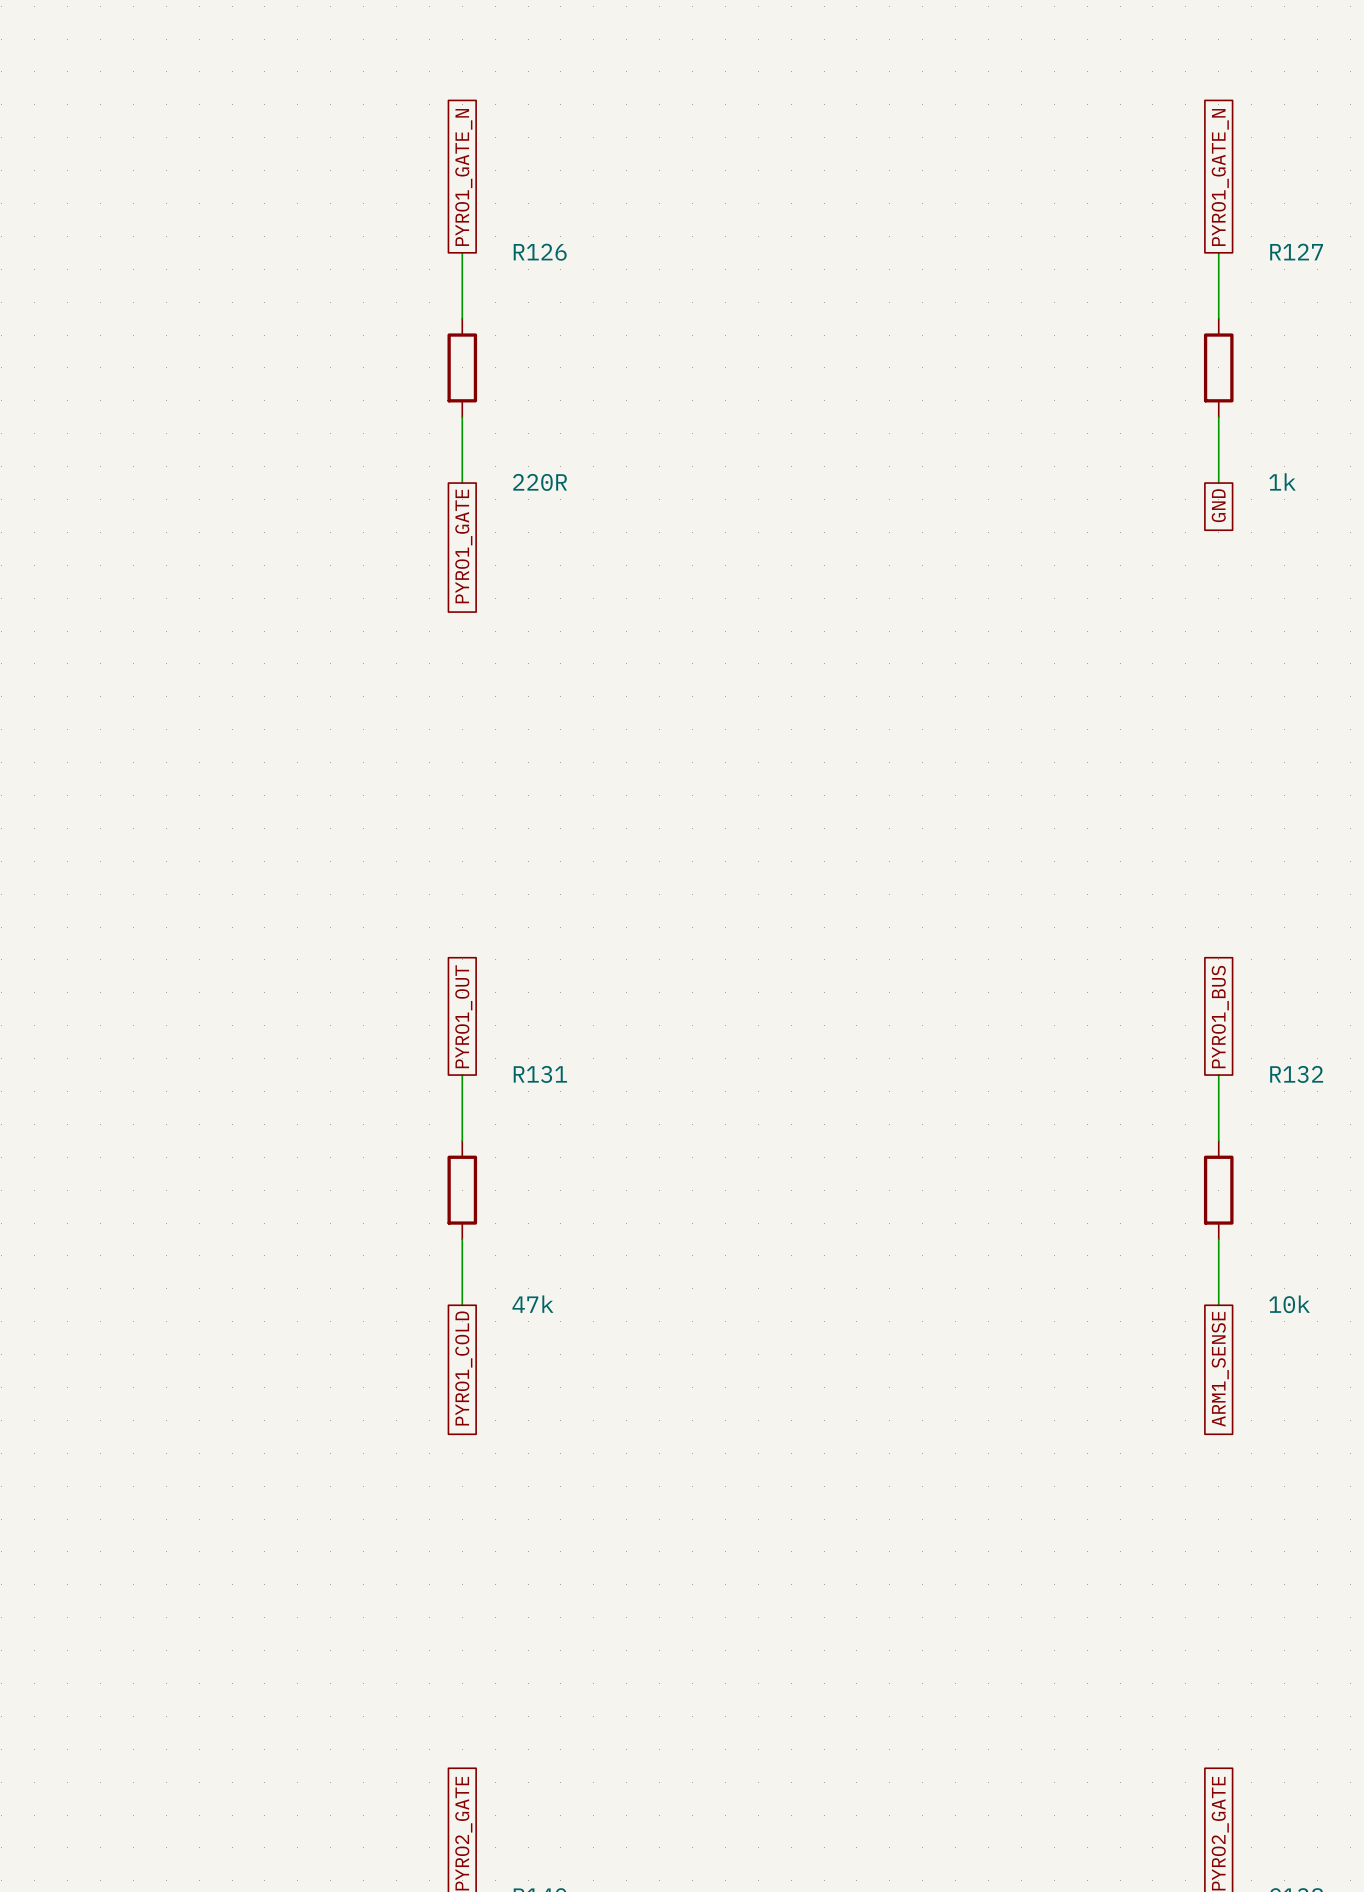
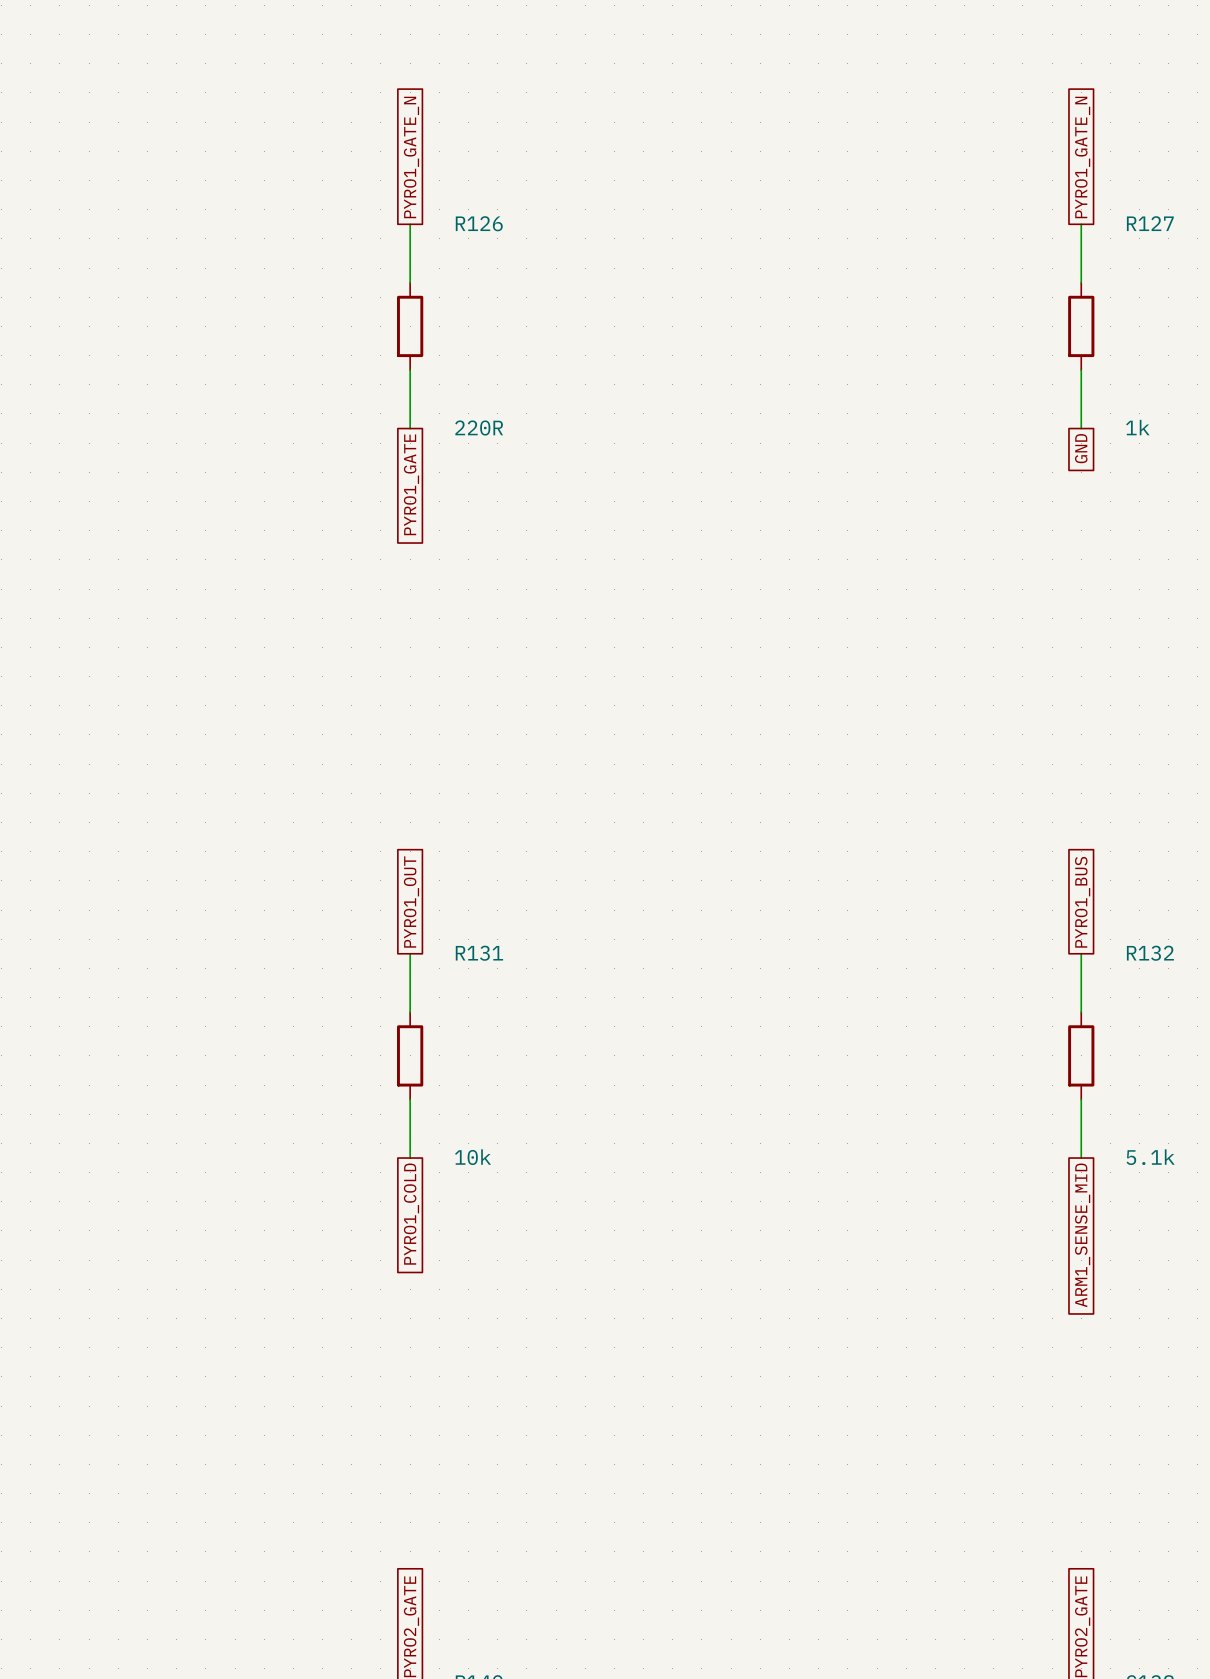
R131 value: 47k (532, 1304) -> 10k (473, 1157)
R132 value: 10k (1289, 1304) -> 5.1k (1150, 1157)
global label: ARM1_SENSE (1220, 1369) -> ARM1_SENSE_MID (1082, 1235)

